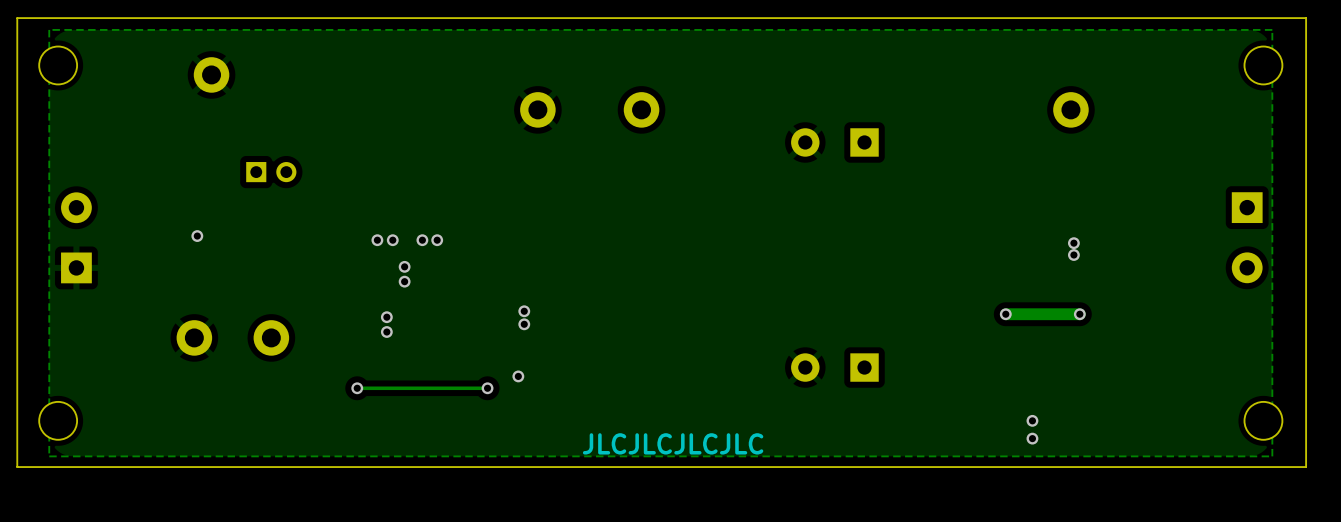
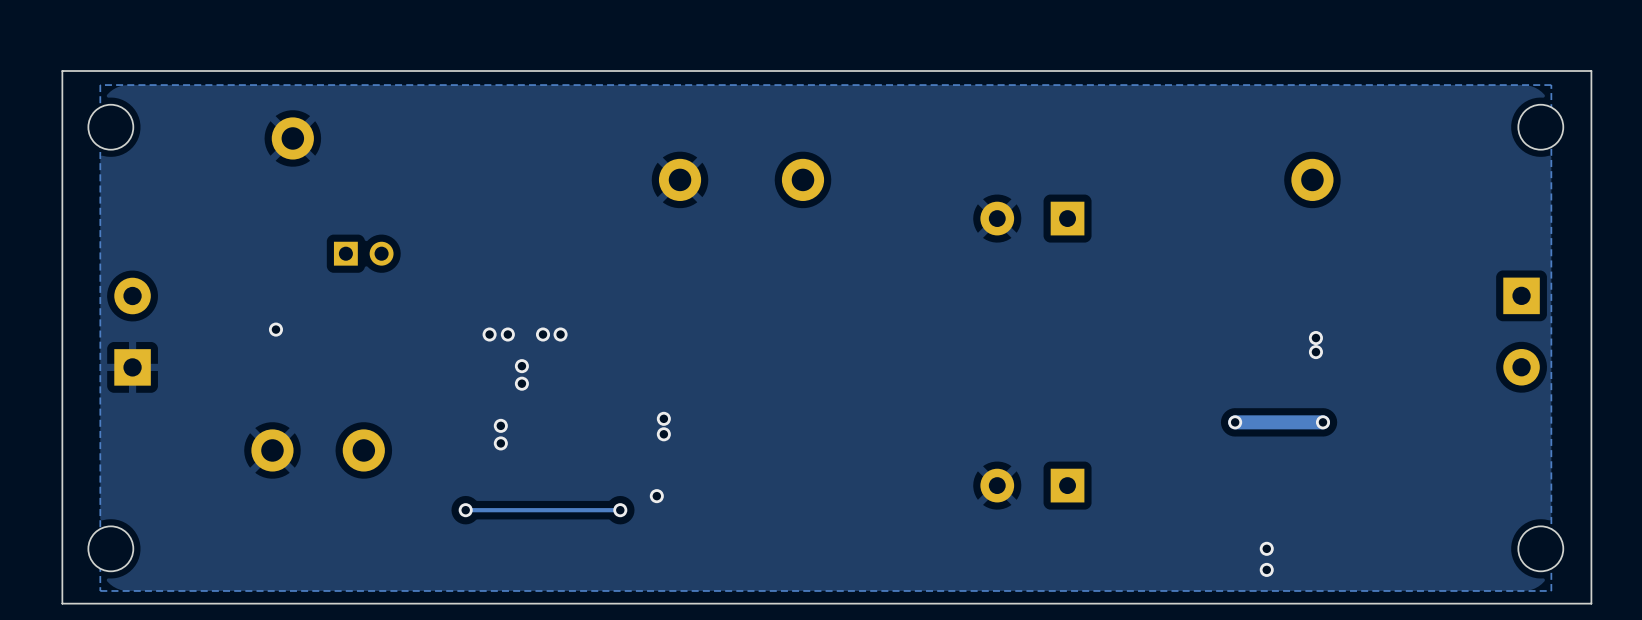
text: JLCJLCJLCJLC (673, 443) -> none

